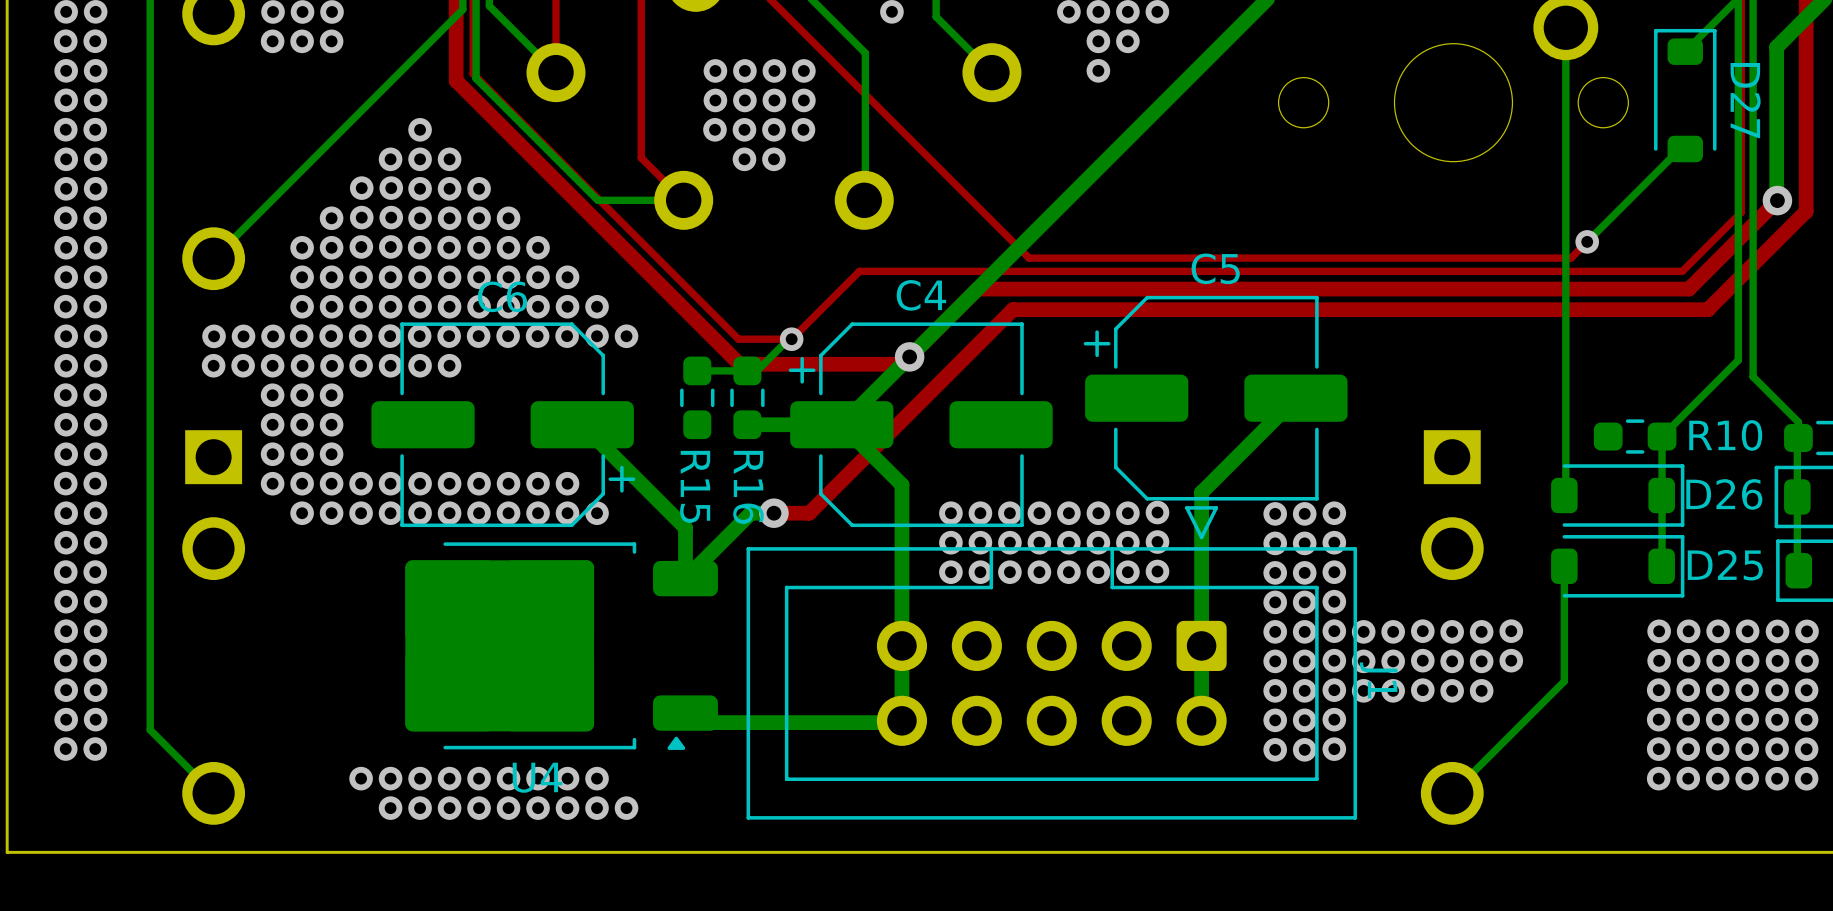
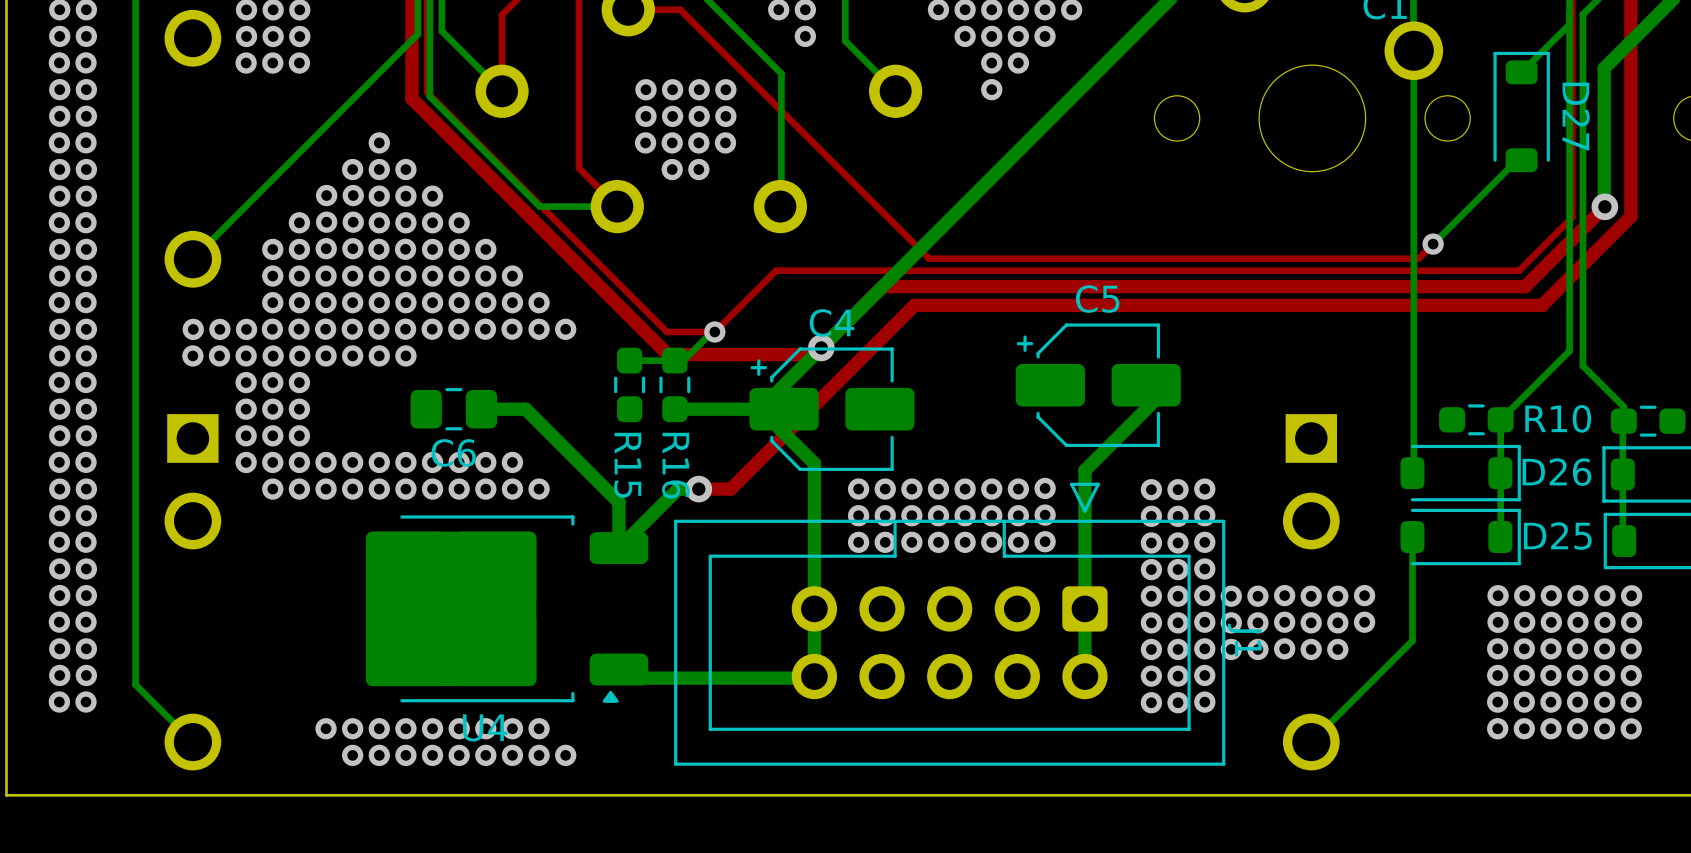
C5 footprint: [1083, 295, 1348, 501] -> [1015, 323, 1181, 448]
C6 name position: C6 (502, 296) -> C6 (453, 452)
C6 footprint: [371, 322, 636, 528] -> [410, 388, 498, 431]
C4 footprint: [788, 322, 1053, 528] -> [749, 347, 915, 471]
bottom track: none -> (525, 409) (481, 409)

